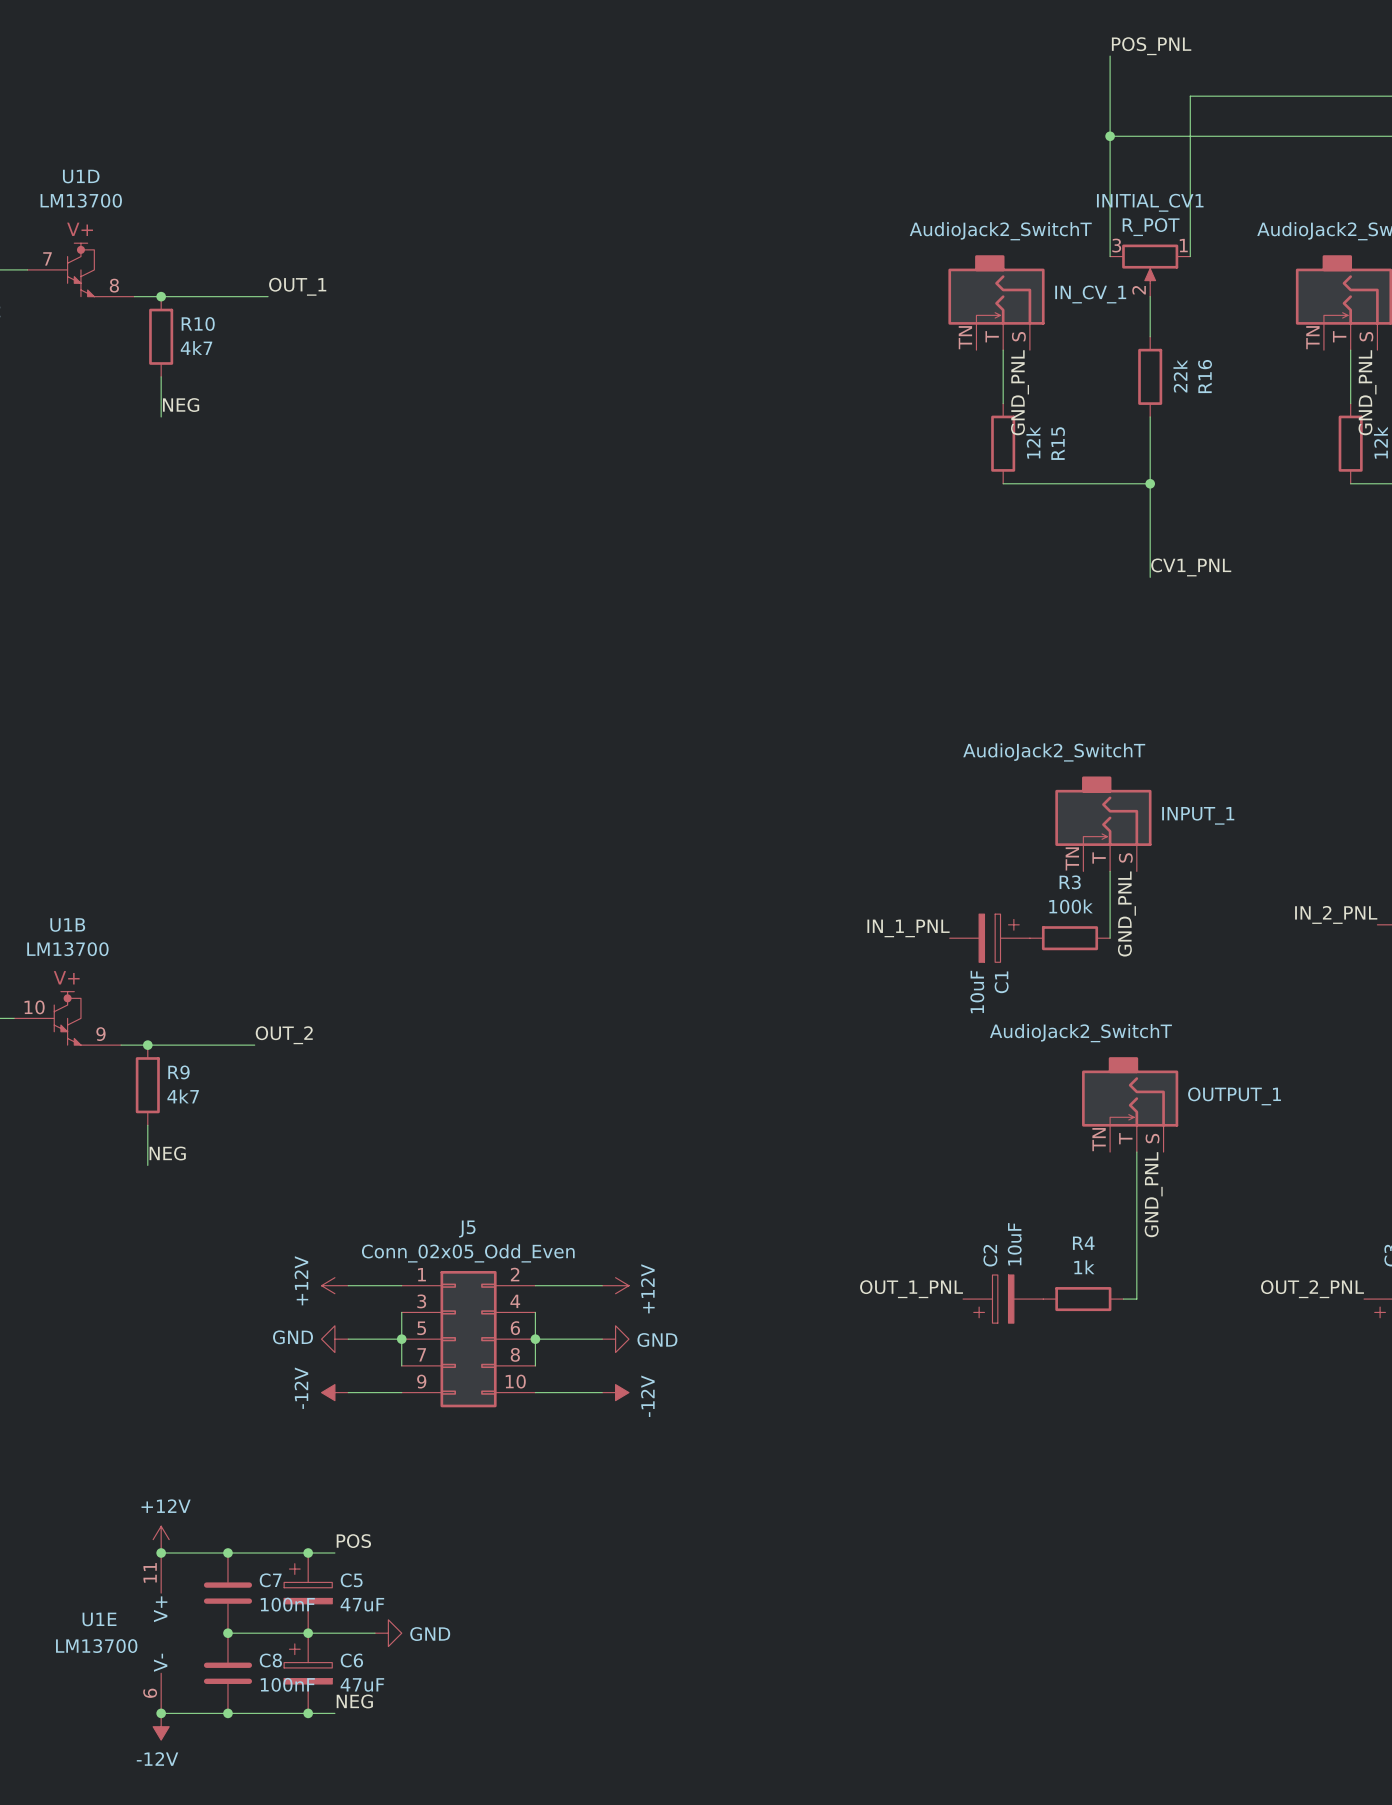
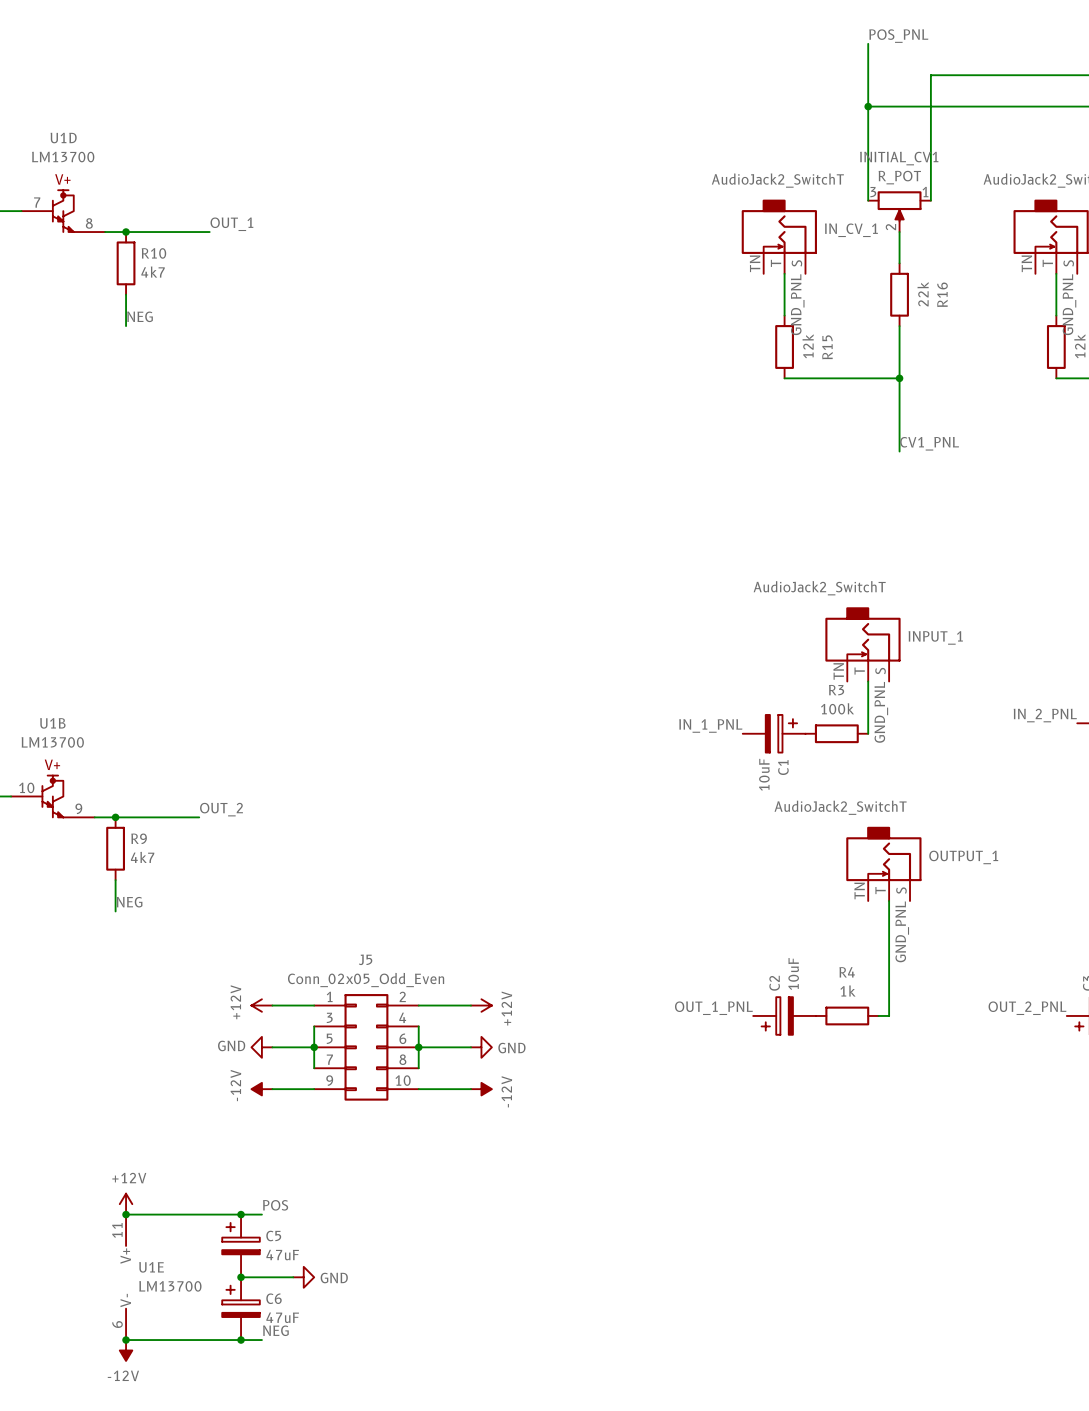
junction: (227, 1553) -> none
C7: 100nF (227, 1593) -> none
U1E name position: U1E (99, 1619) -> U1E (151, 1267)
wire: (227, 1633) (308, 1633) -> none
junction: (227, 1633) -> none
U1E value position: LM13700 (96, 1646) -> LM13700 (170, 1286)
C8: 100nF (227, 1673) -> none
junction: (227, 1713) -> none

